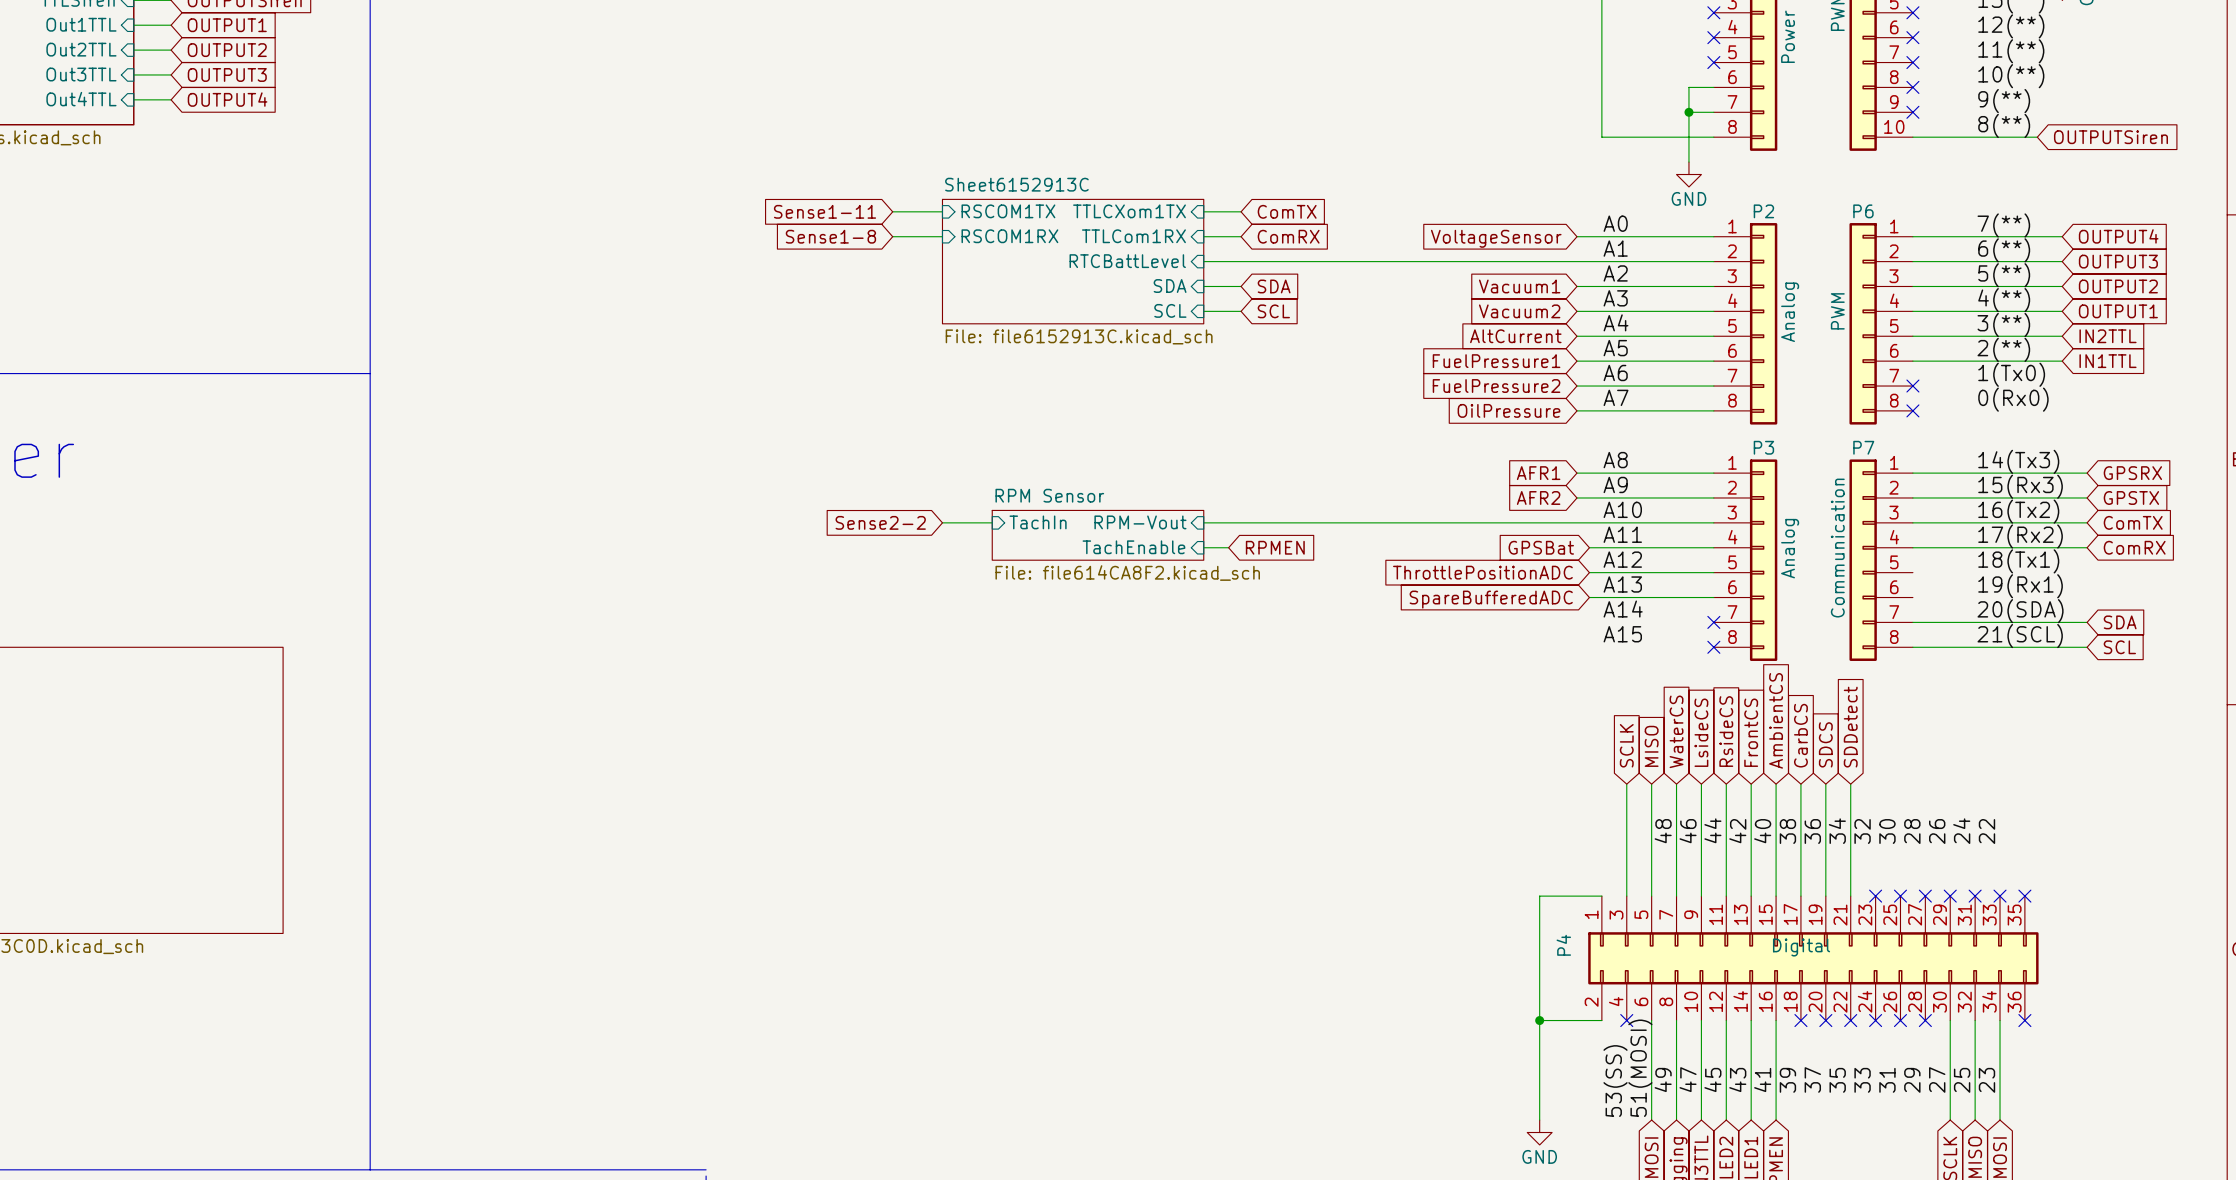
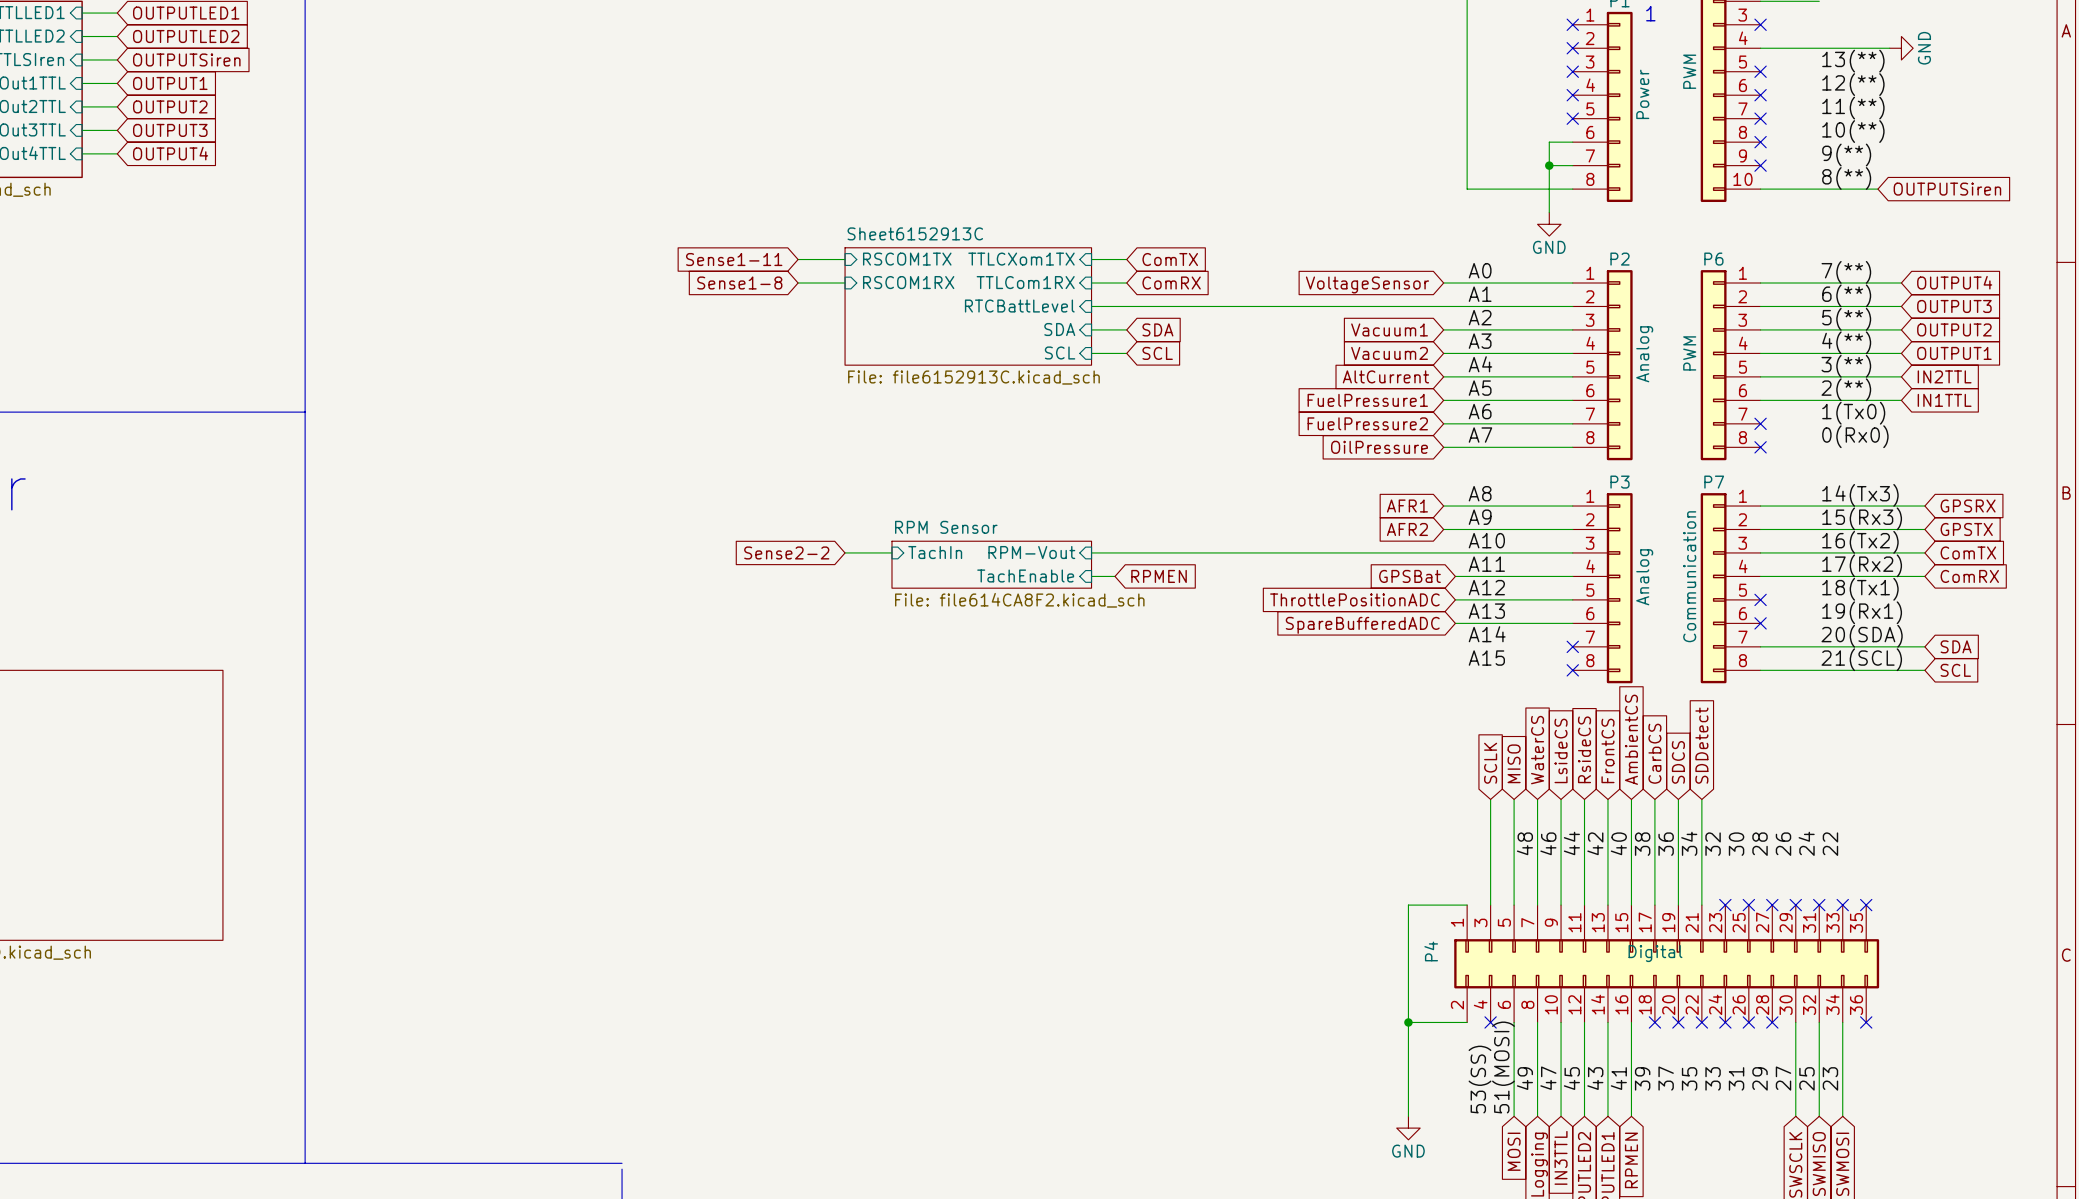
no-connect mark: none -> (1760, 599)
no-connect mark: none -> (1760, 623)

